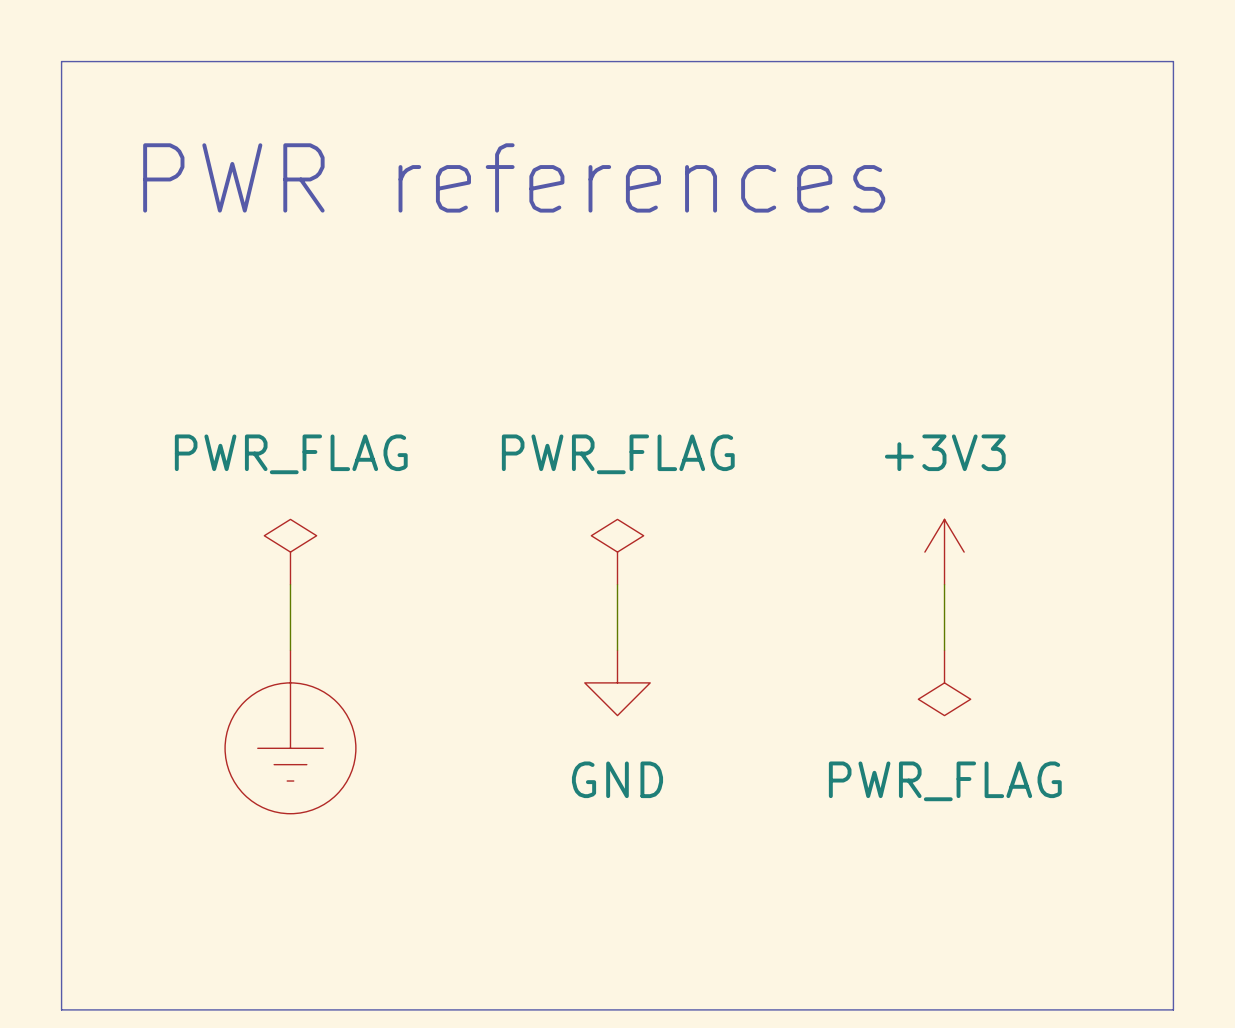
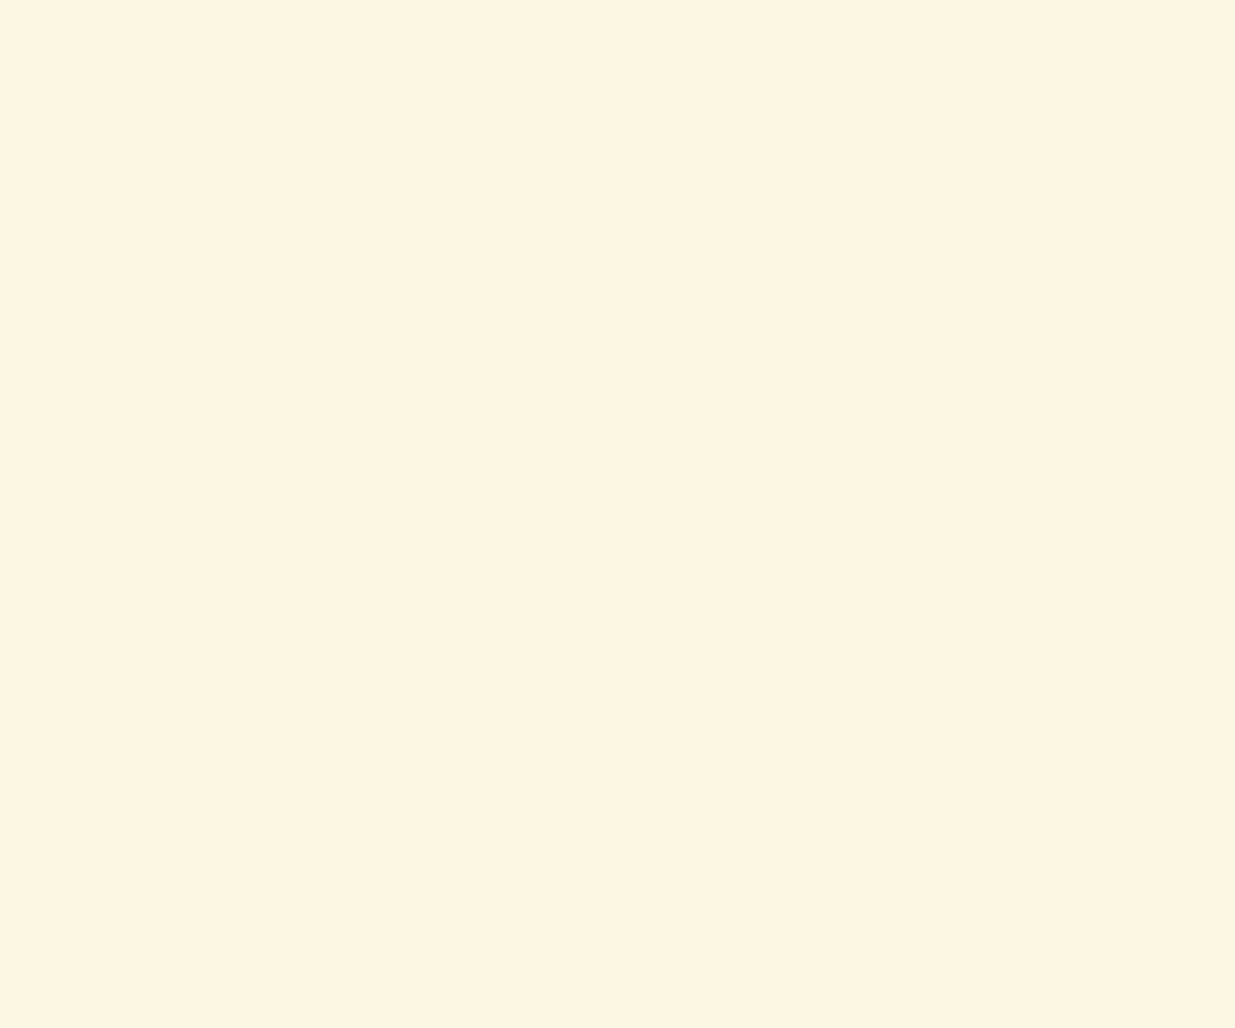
line: (61, 61) (1173, 61) (1173, 1009) (61, 1009) (61, 61) -> none
text: PWR references (514, 177) -> none
power symbol: PWR_FLAG (290, 552) -> none
power symbol: PWR_FLAG (617, 552) -> none
power symbol: +3V3 (944, 552) -> none
wire: (290, 584) (290, 650) -> none
wire: (617, 584) (617, 650) -> none
wire: (944, 584) (944, 650) -> none
power symbol: GND (617, 682) -> none
power symbol: PWR_FLAG (944, 682) -> none
power symbol: (290, 731) -> none

